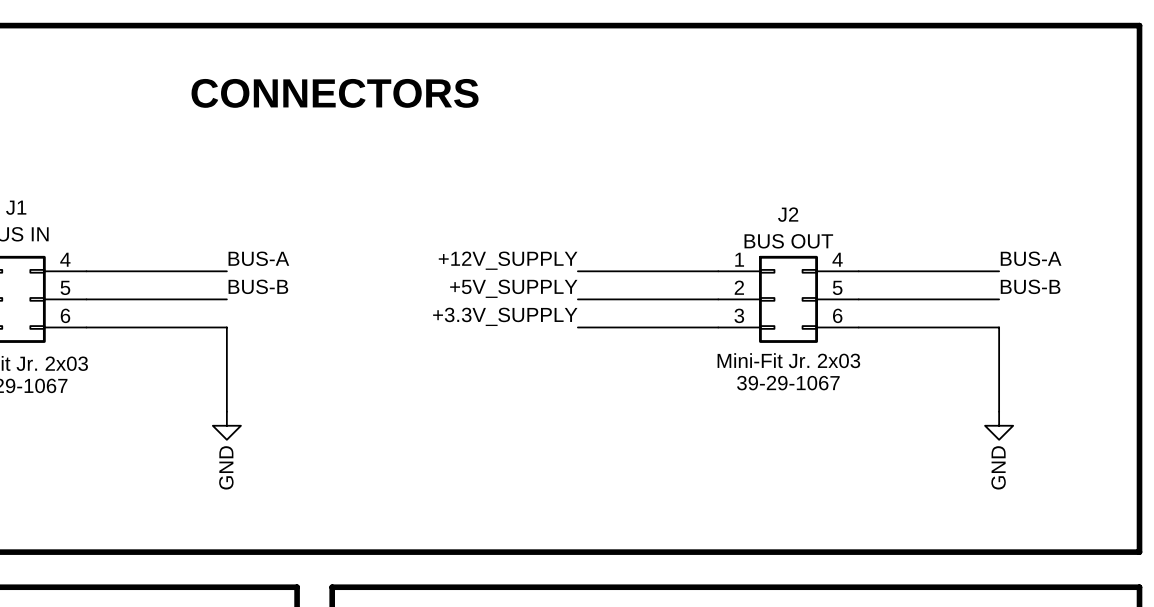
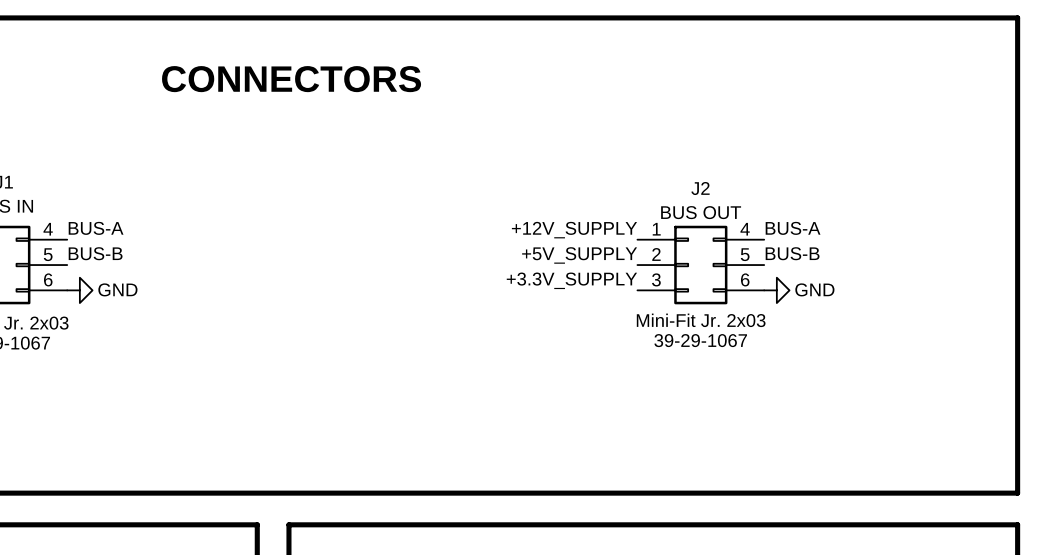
label position: BUS-A (258, 258) -> BUS-A (96, 228)
label position: BUS-A (1031, 258) -> BUS-A (793, 228)
label position: +12V_SUPPLY (508, 260) -> +12V_SUPPLY (574, 230)
wire: (86, 271) (226, 271) -> none
wire: (577, 271) (718, 271) -> none
wire: (858, 271) (999, 271) -> none
label position: BUS-B (258, 286) -> BUS-B (95, 253)
label position: BUS-B (1030, 286) -> BUS-B (792, 253)
label position: +5V_SUPPLY (513, 288) -> +5V_SUPPLY (579, 255)
wire: (86, 299) (226, 299) -> none
wire: (577, 299) (718, 299) -> none
wire: (858, 299) (999, 299) -> none
label position: +3.3V_SUPPLY (505, 316) -> +3.3V_SUPPLY (571, 280)
wire: (86, 327) (226, 327) (226, 411) -> none
wire: (577, 327) (718, 327) -> none
wire: (858, 327) (999, 327) (999, 411) -> none
power symbol rotation: 0° (226, 425) -> 90° counterclockwise (79, 290)
power symbol position: GND (226, 425) -> GND (79, 290)
power symbol rotation: 0° (999, 425) -> 90° counterclockwise (776, 290)
power symbol position: GND (999, 425) -> GND (776, 290)

